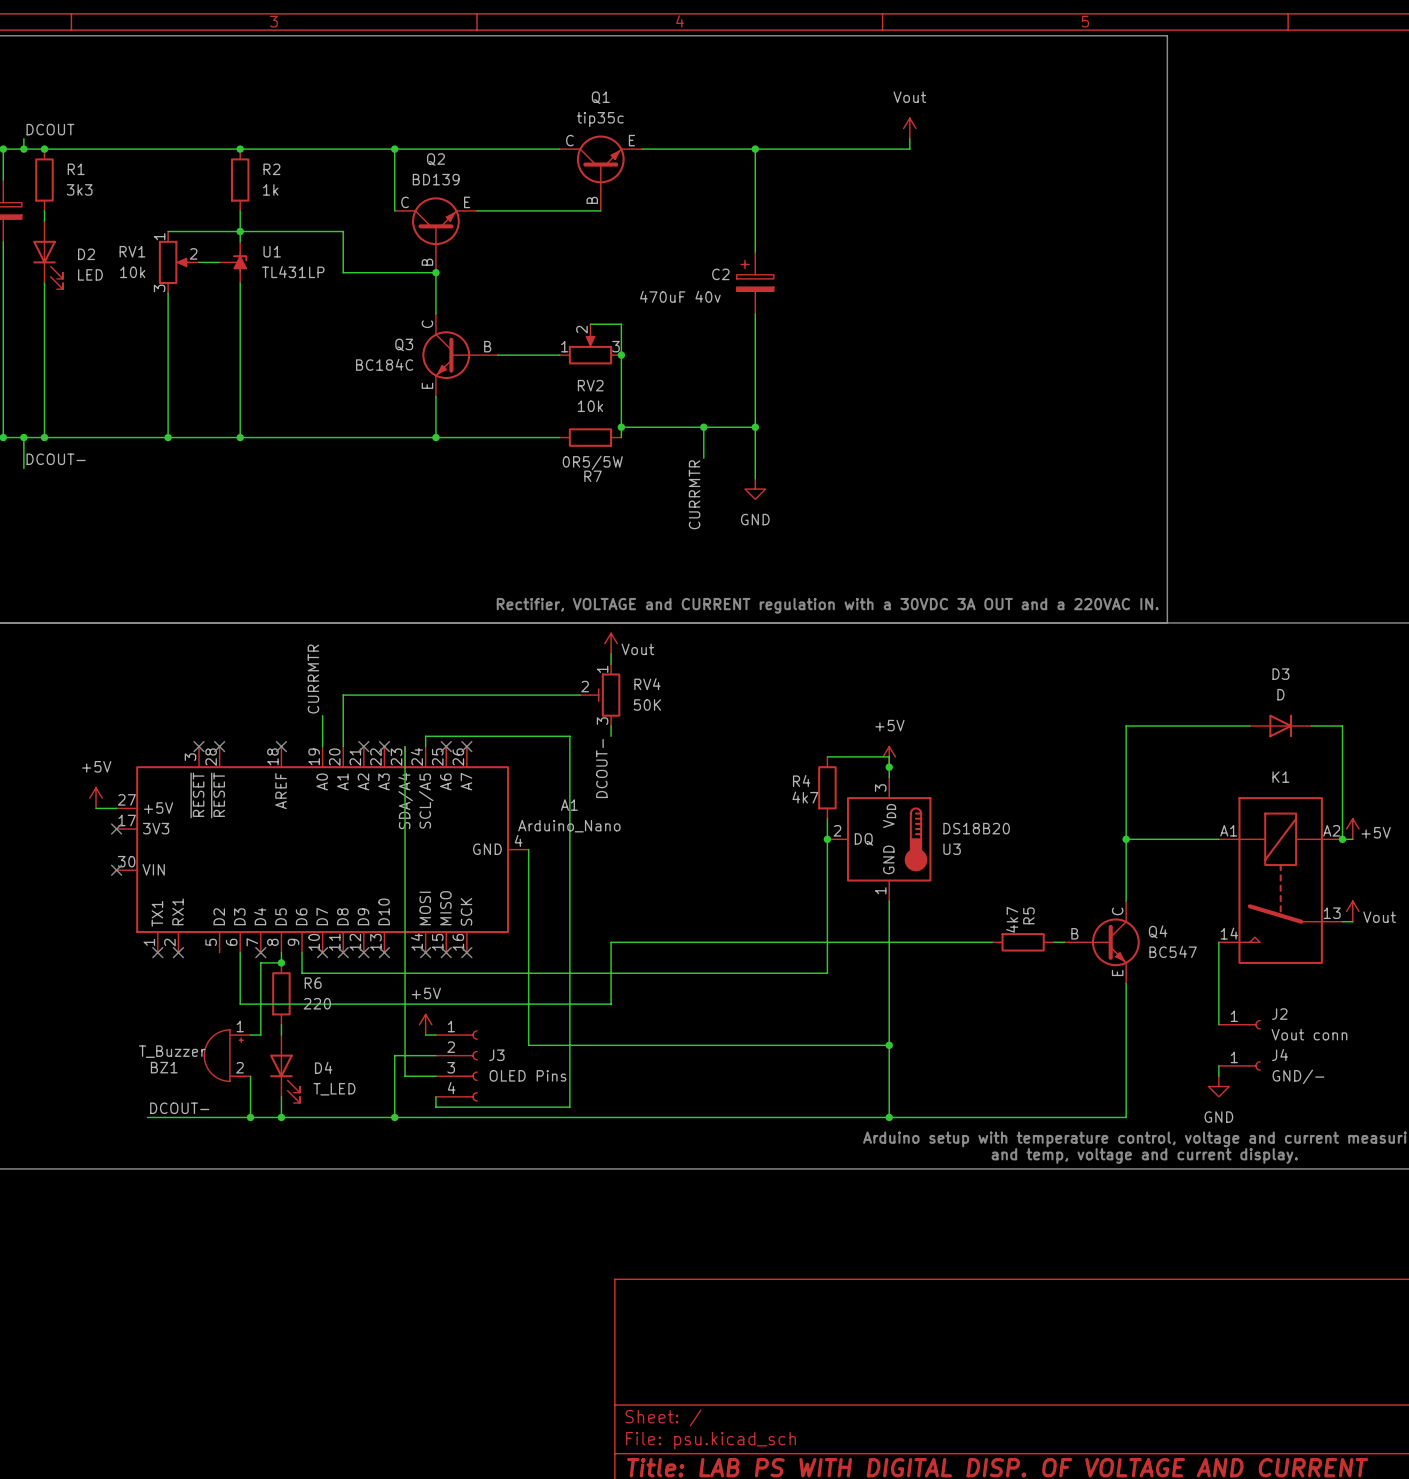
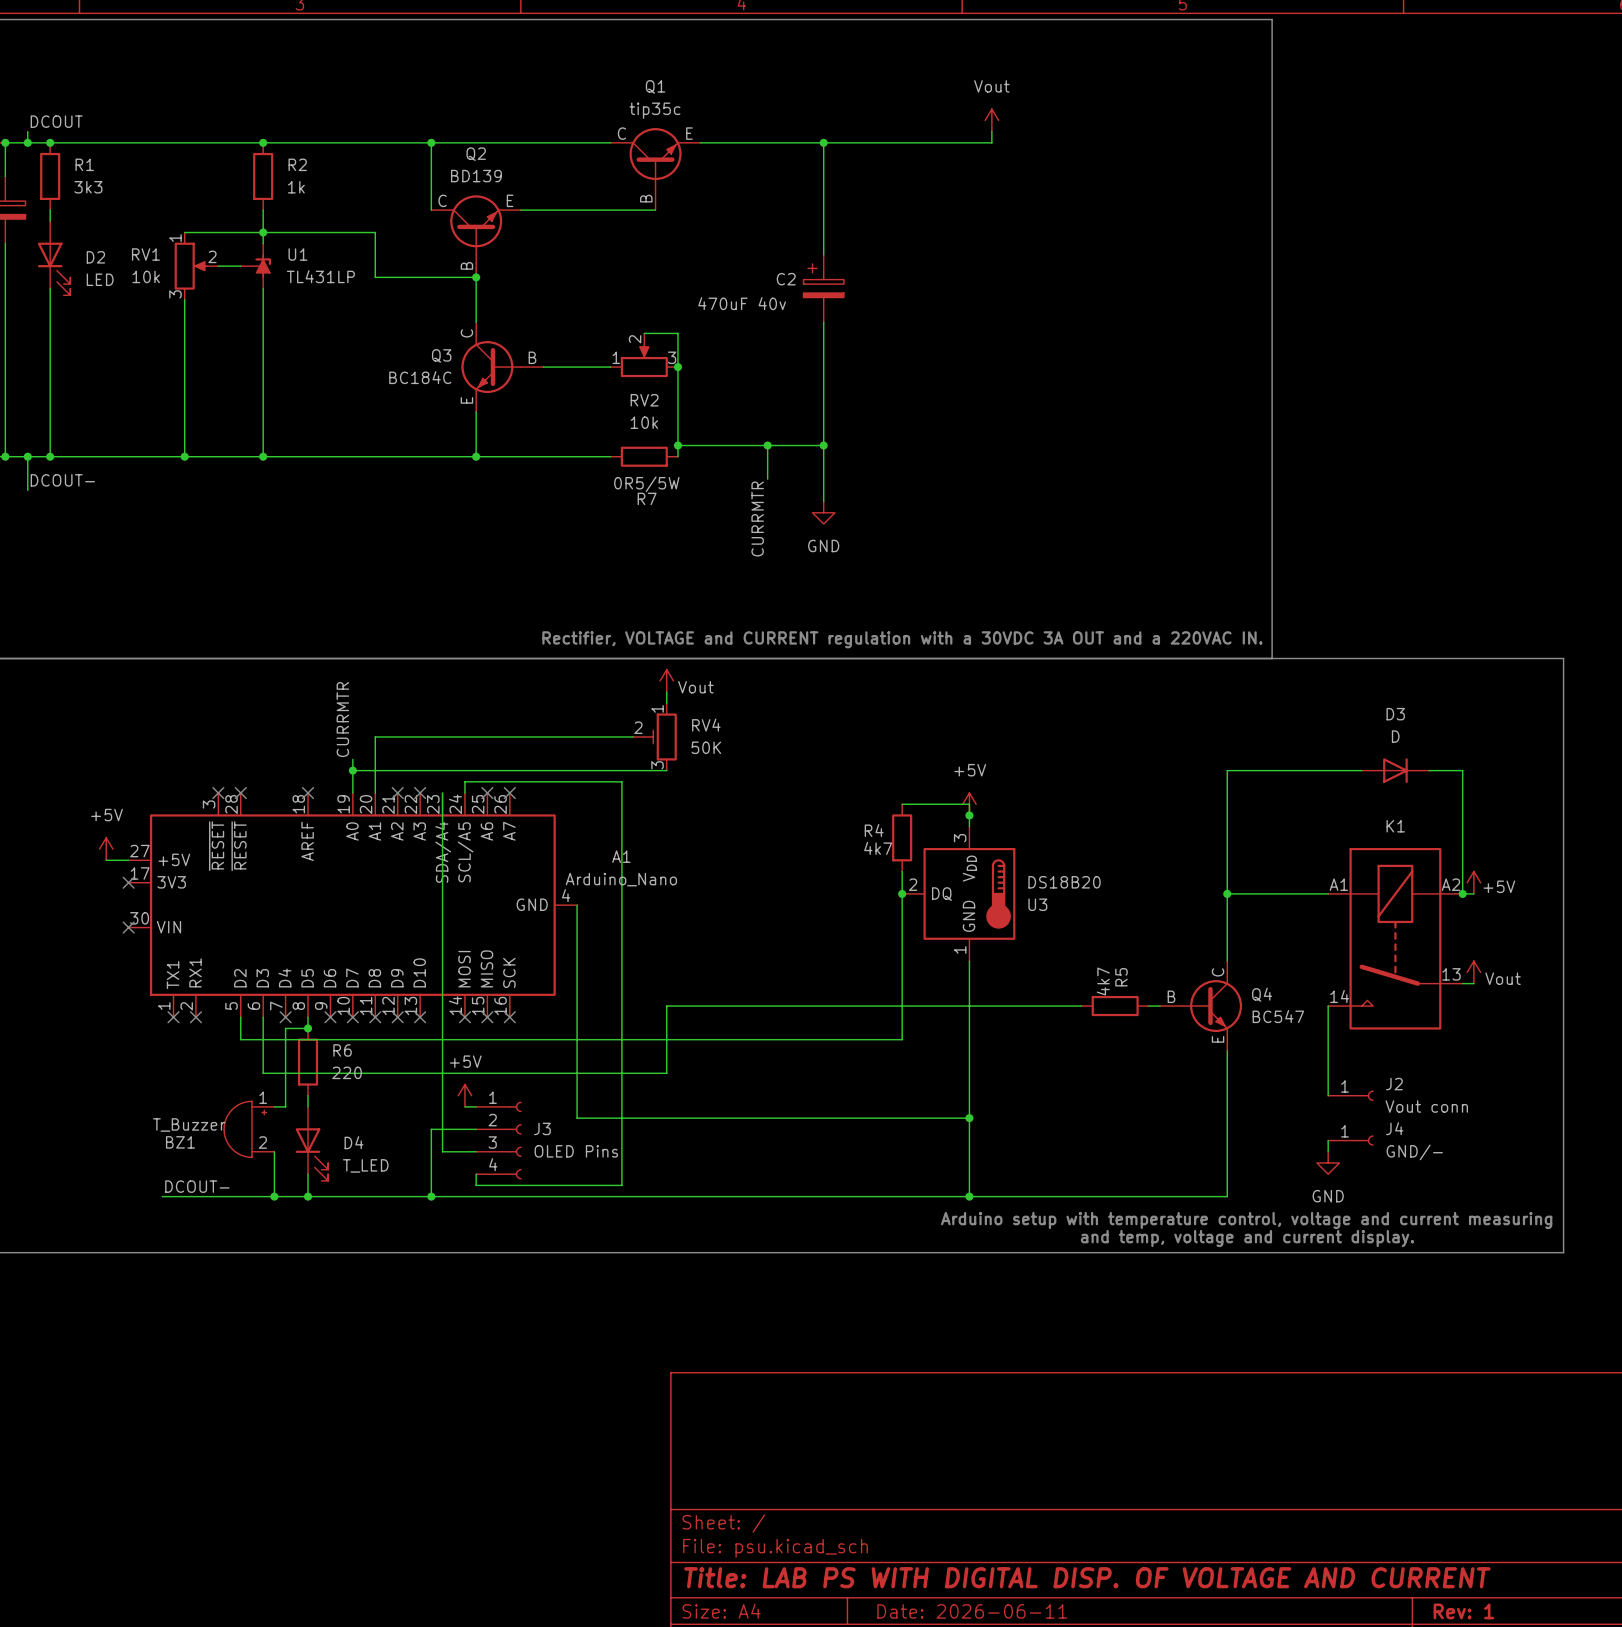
junction: none -> (352, 770)
wire: (611, 725) (611, 736) -> (666, 770) (352, 770)
label: DCOUT- (601, 768) -> none
wire: (302, 952) (302, 973) -> (240, 1017) (240, 1039) (330, 1039)
no-connect mark: none -> (330, 1017)

